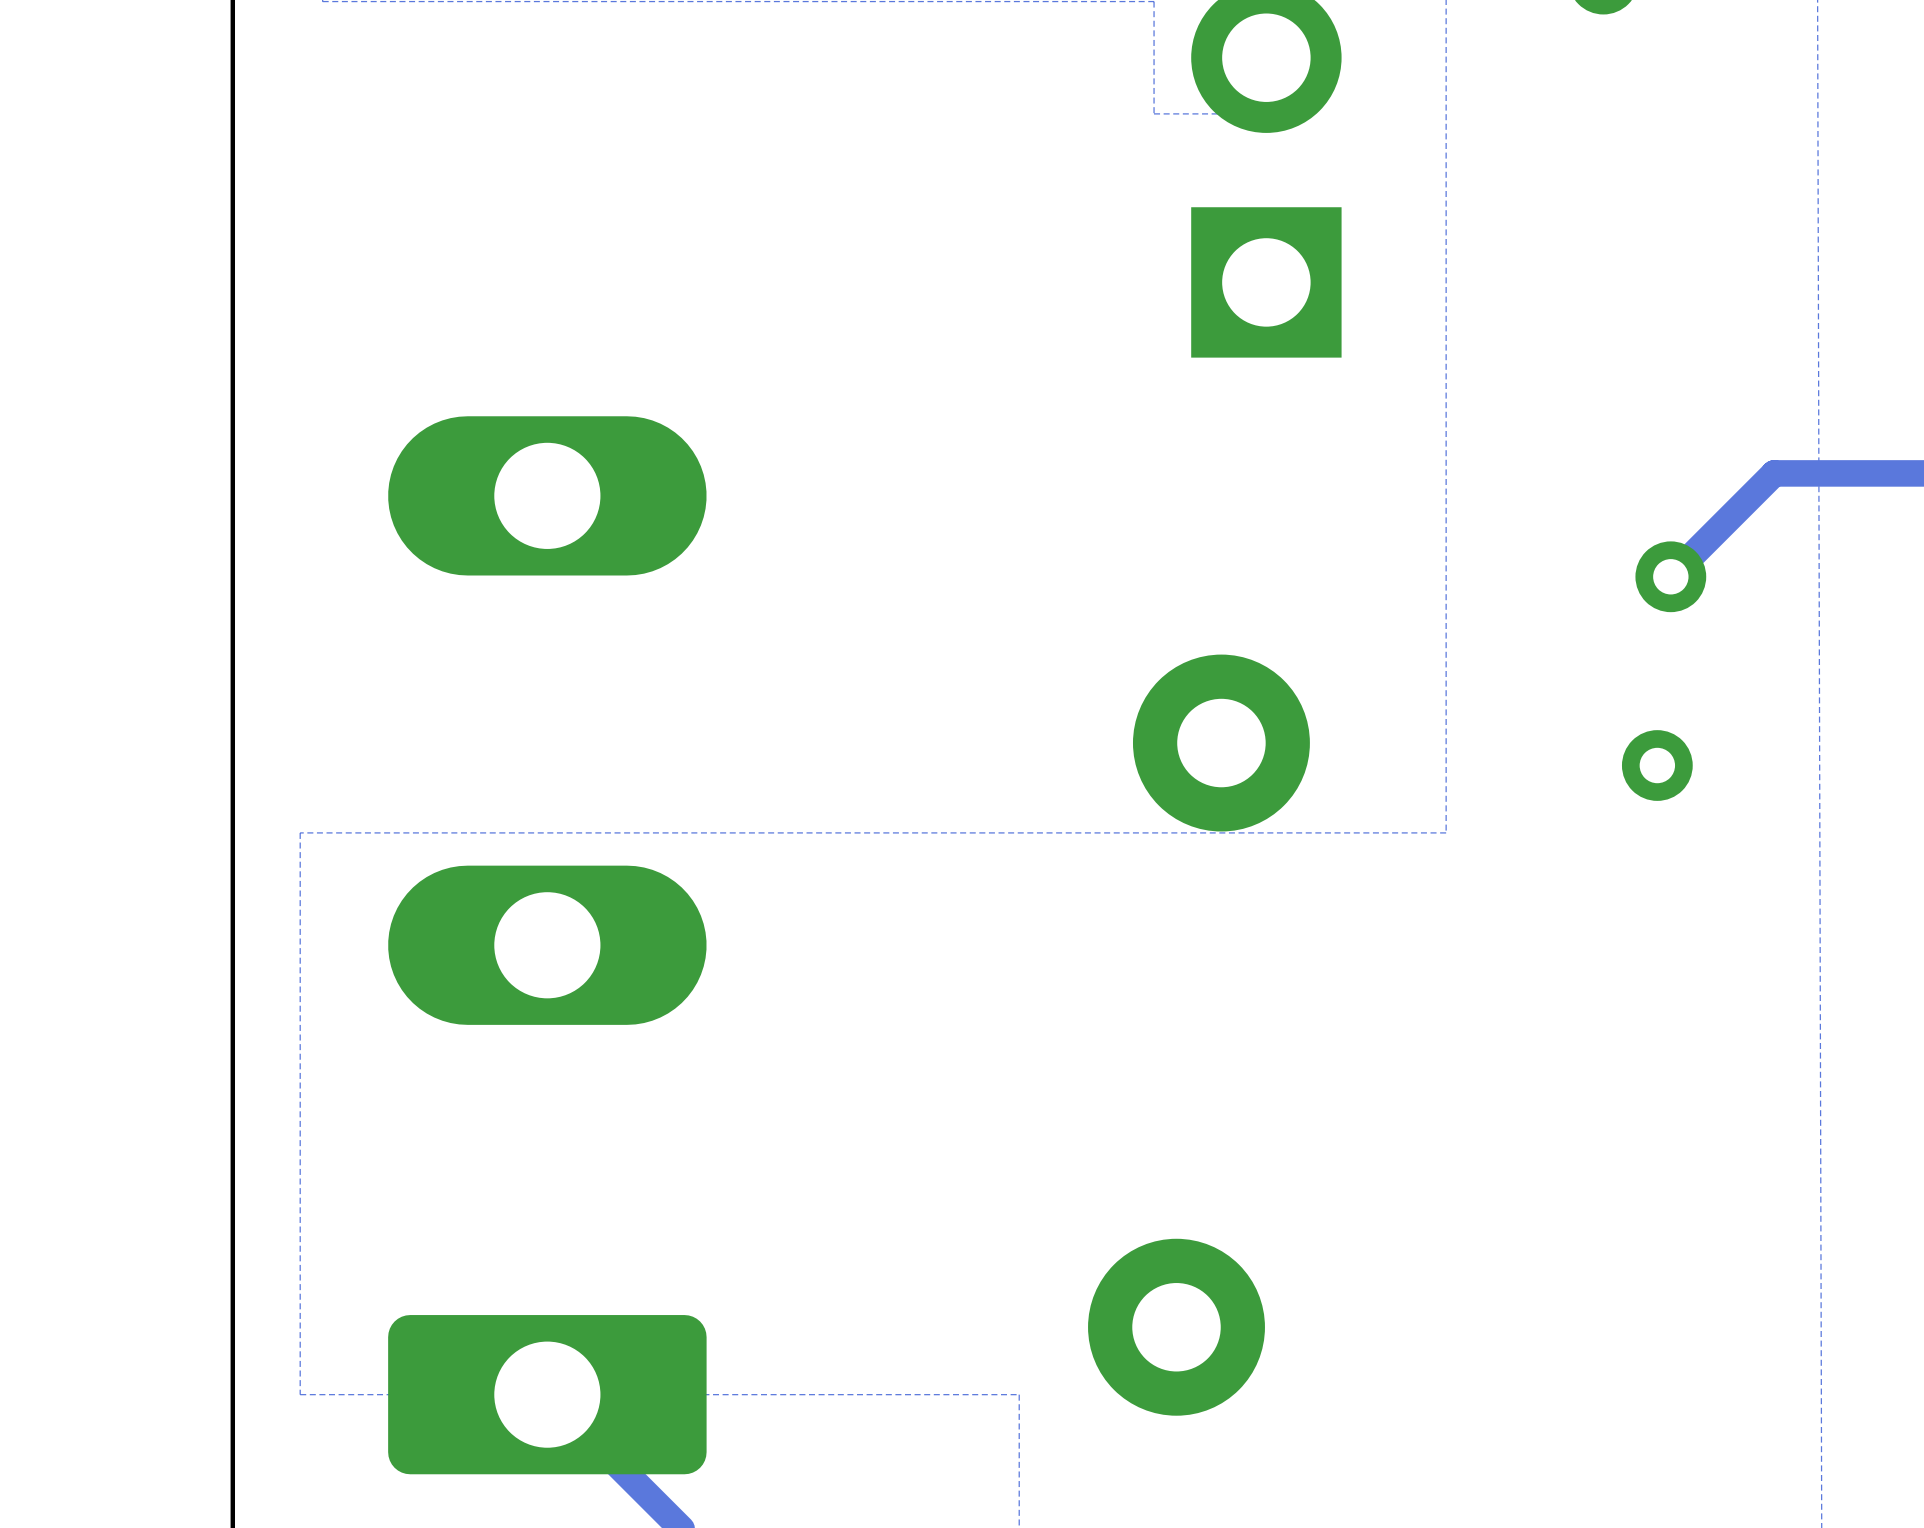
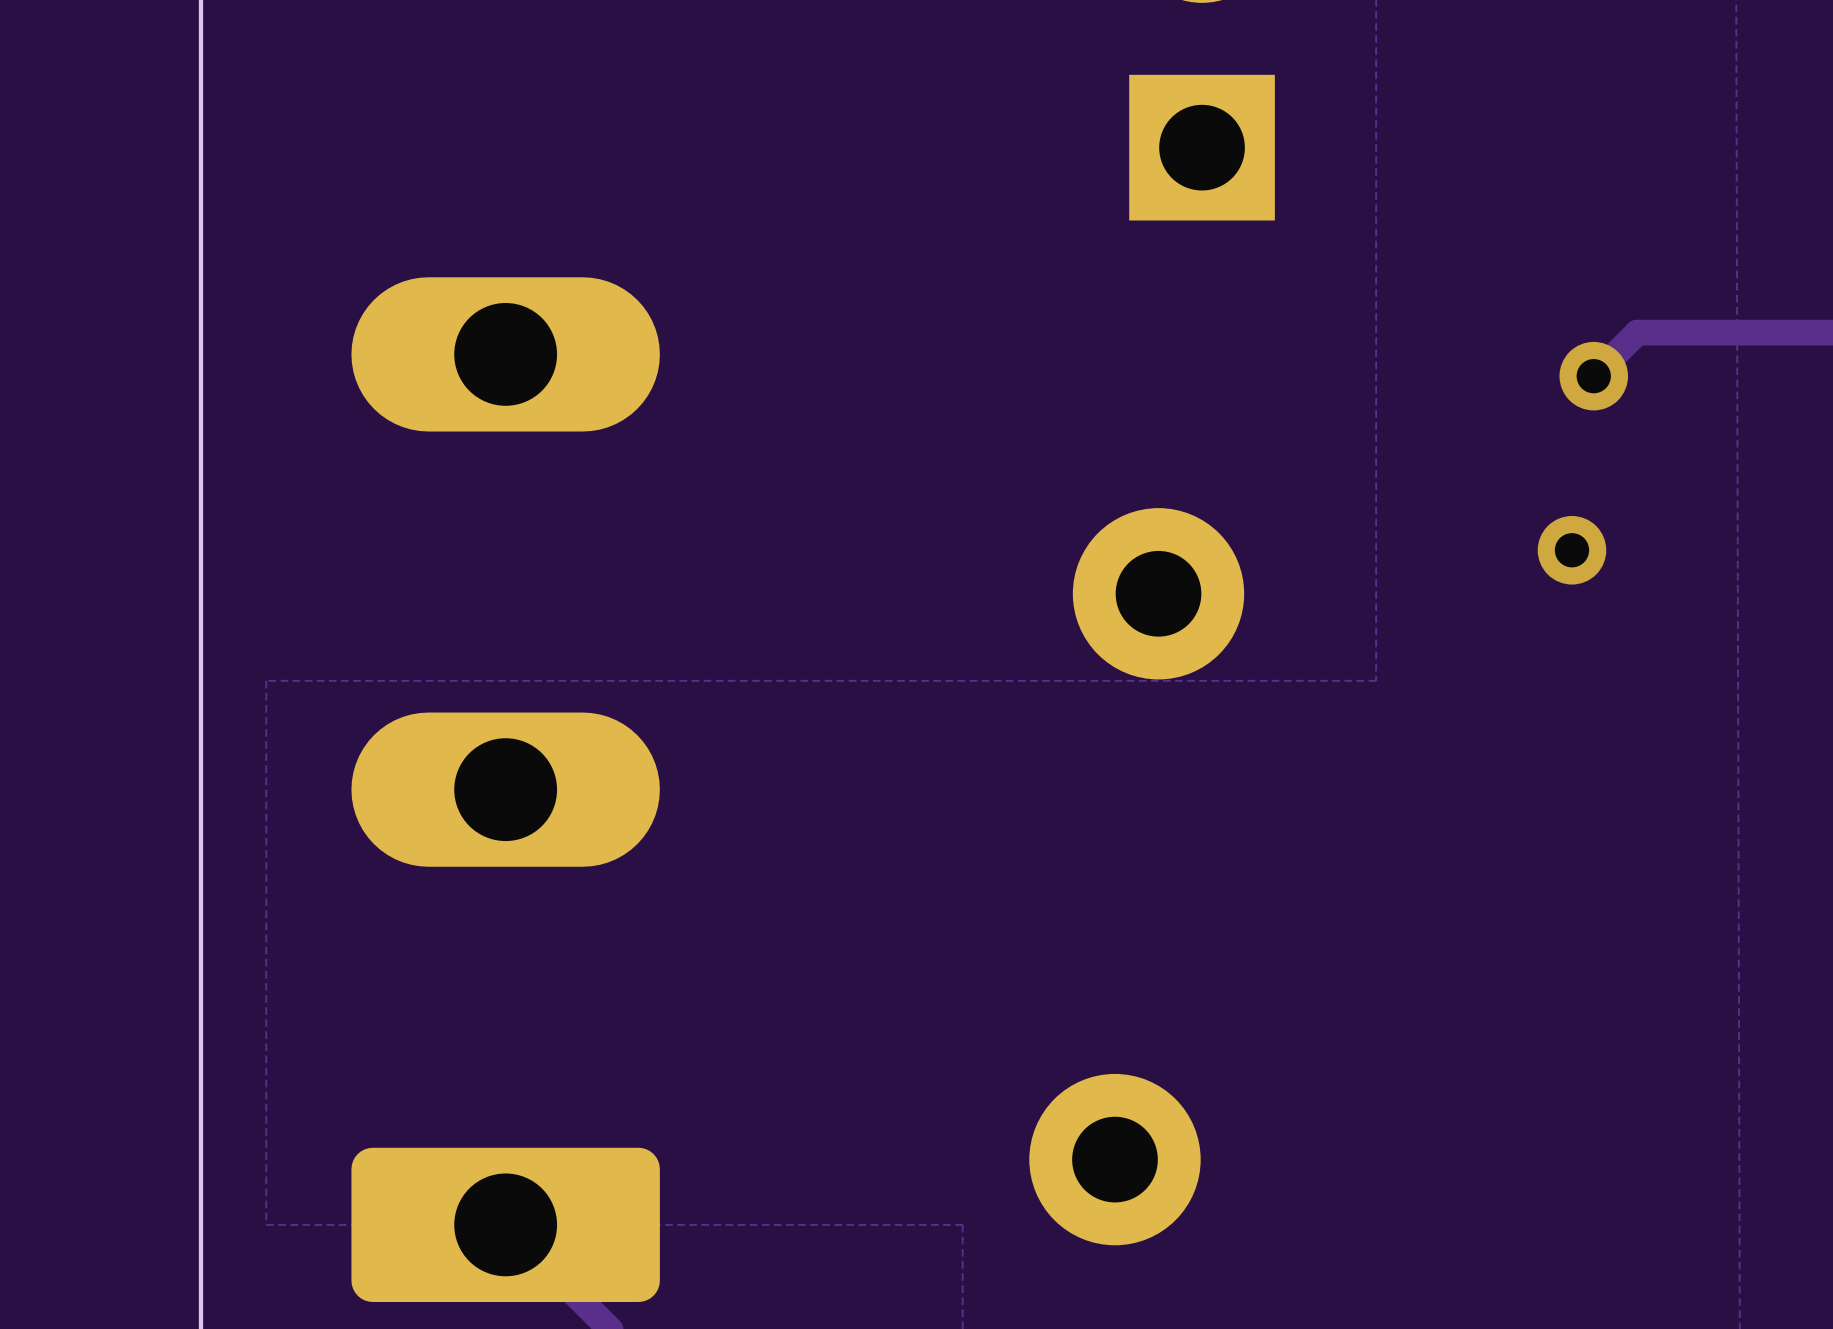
track: (1774, 473) (1670, 576) -> (1693, 332) (1637, 332) (1593, 376)
via position: (1670, 576) -> (1593, 376)
via position: (1657, 765) -> (1571, 550)

